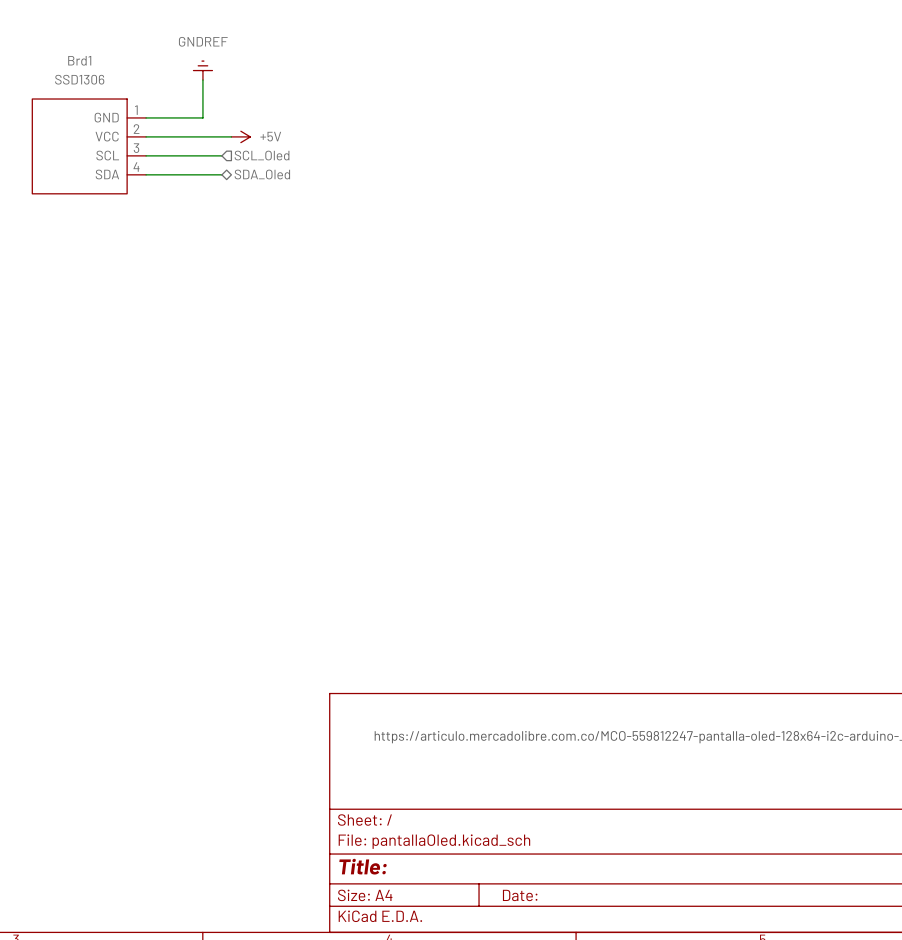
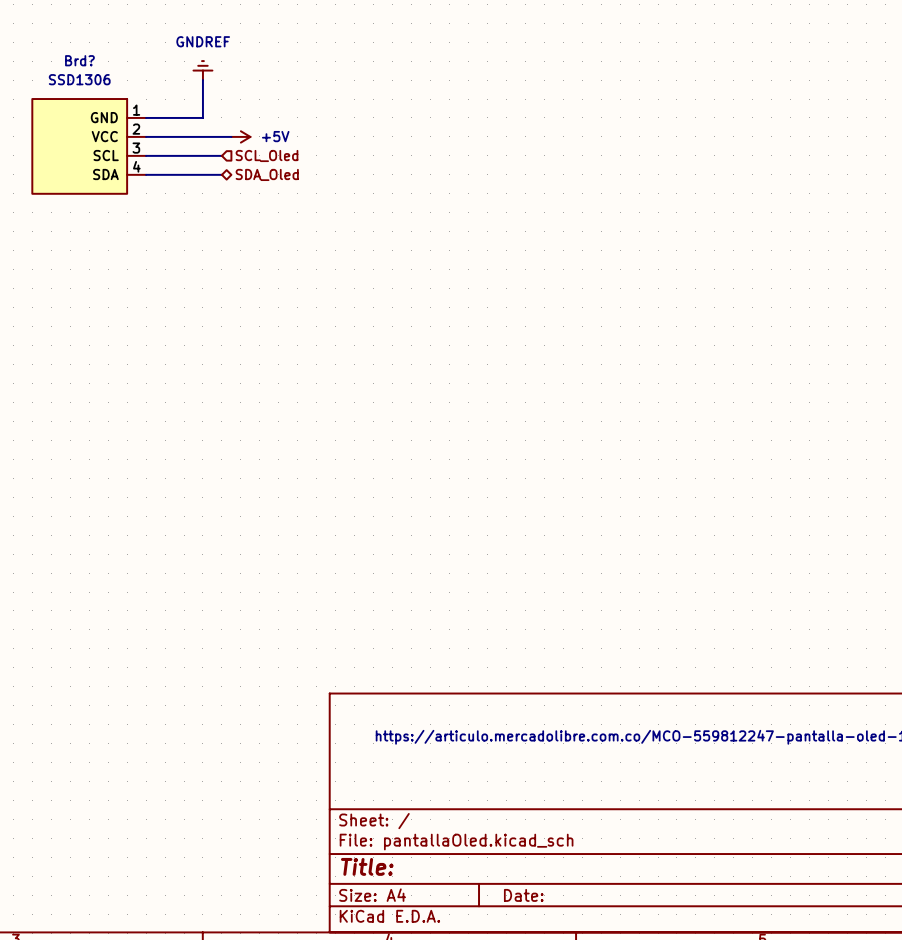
Brd1 name: Brd1 (79, 60) -> Brd? (79, 60)

